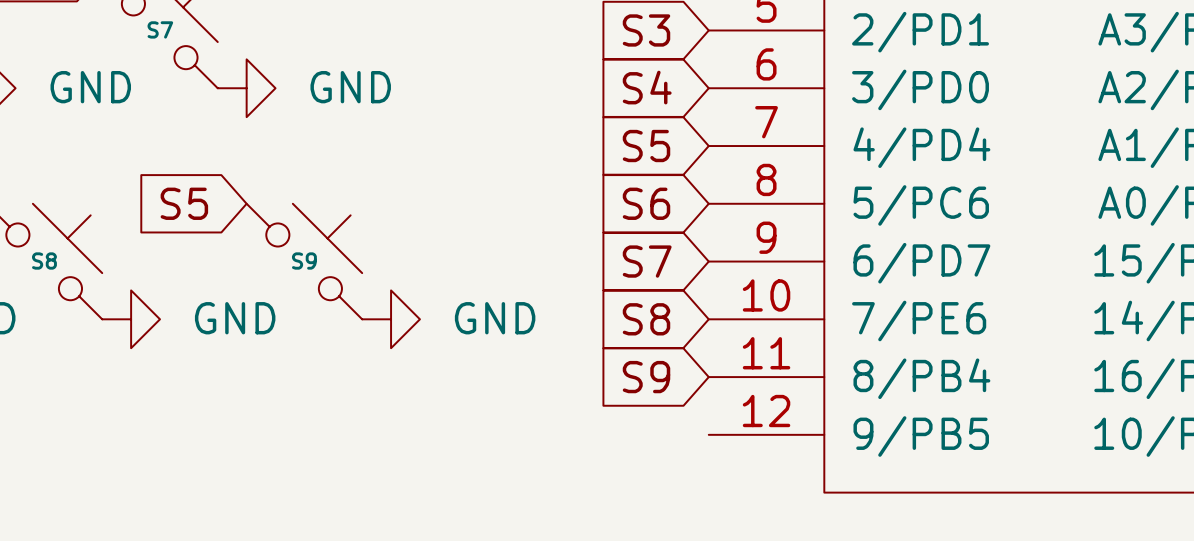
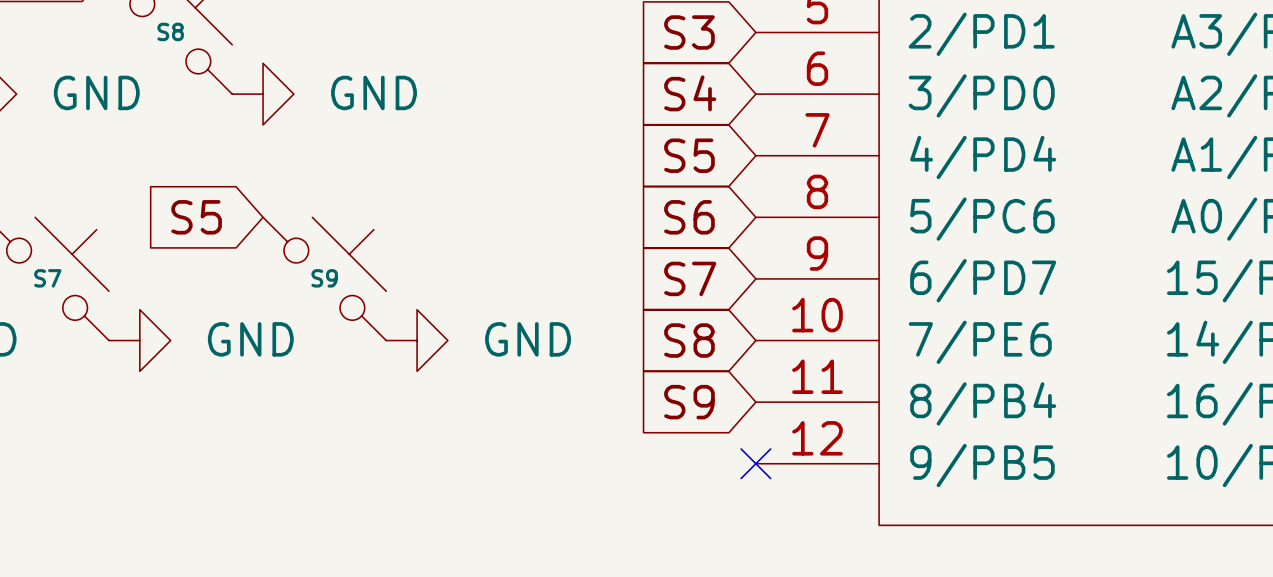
S7 name: S7 (160, 29) -> S8 (170, 31)
S8 name: S8 (44, 261) -> S7 (47, 278)
no-connect mark: none -> (755, 463)

